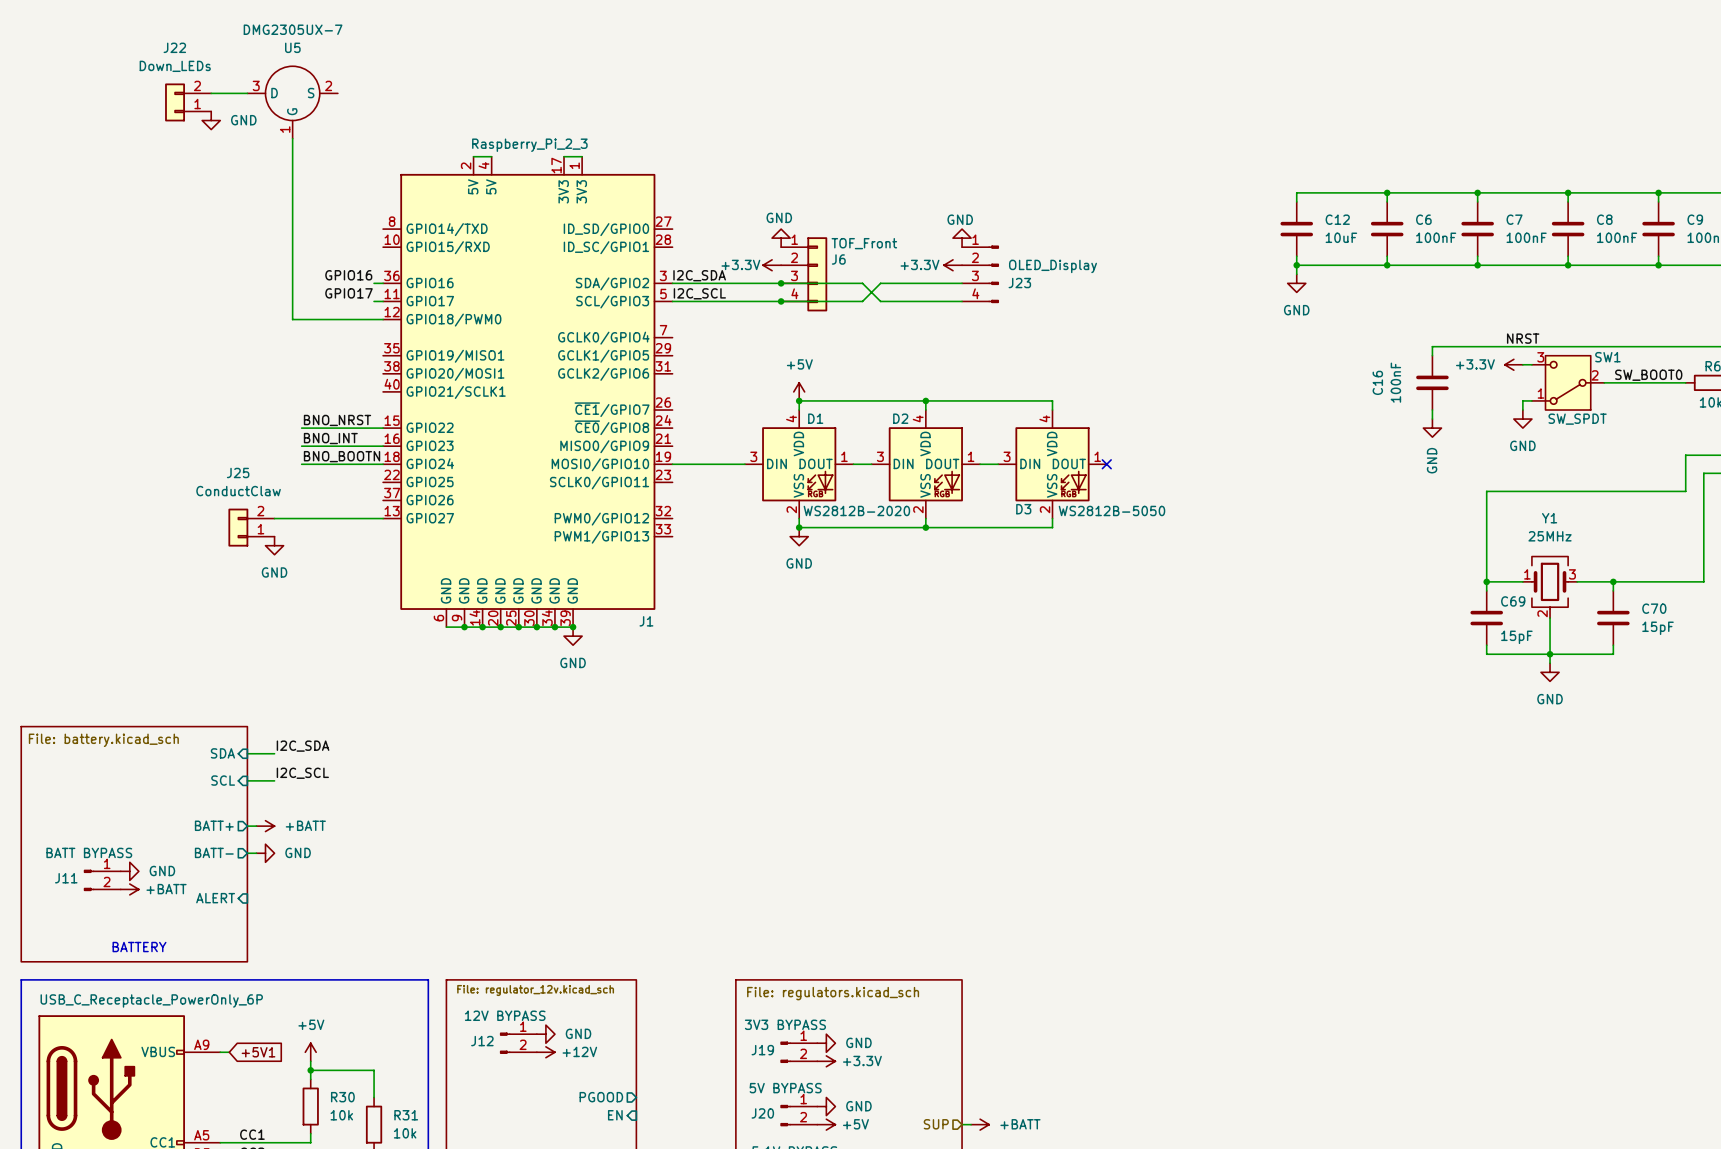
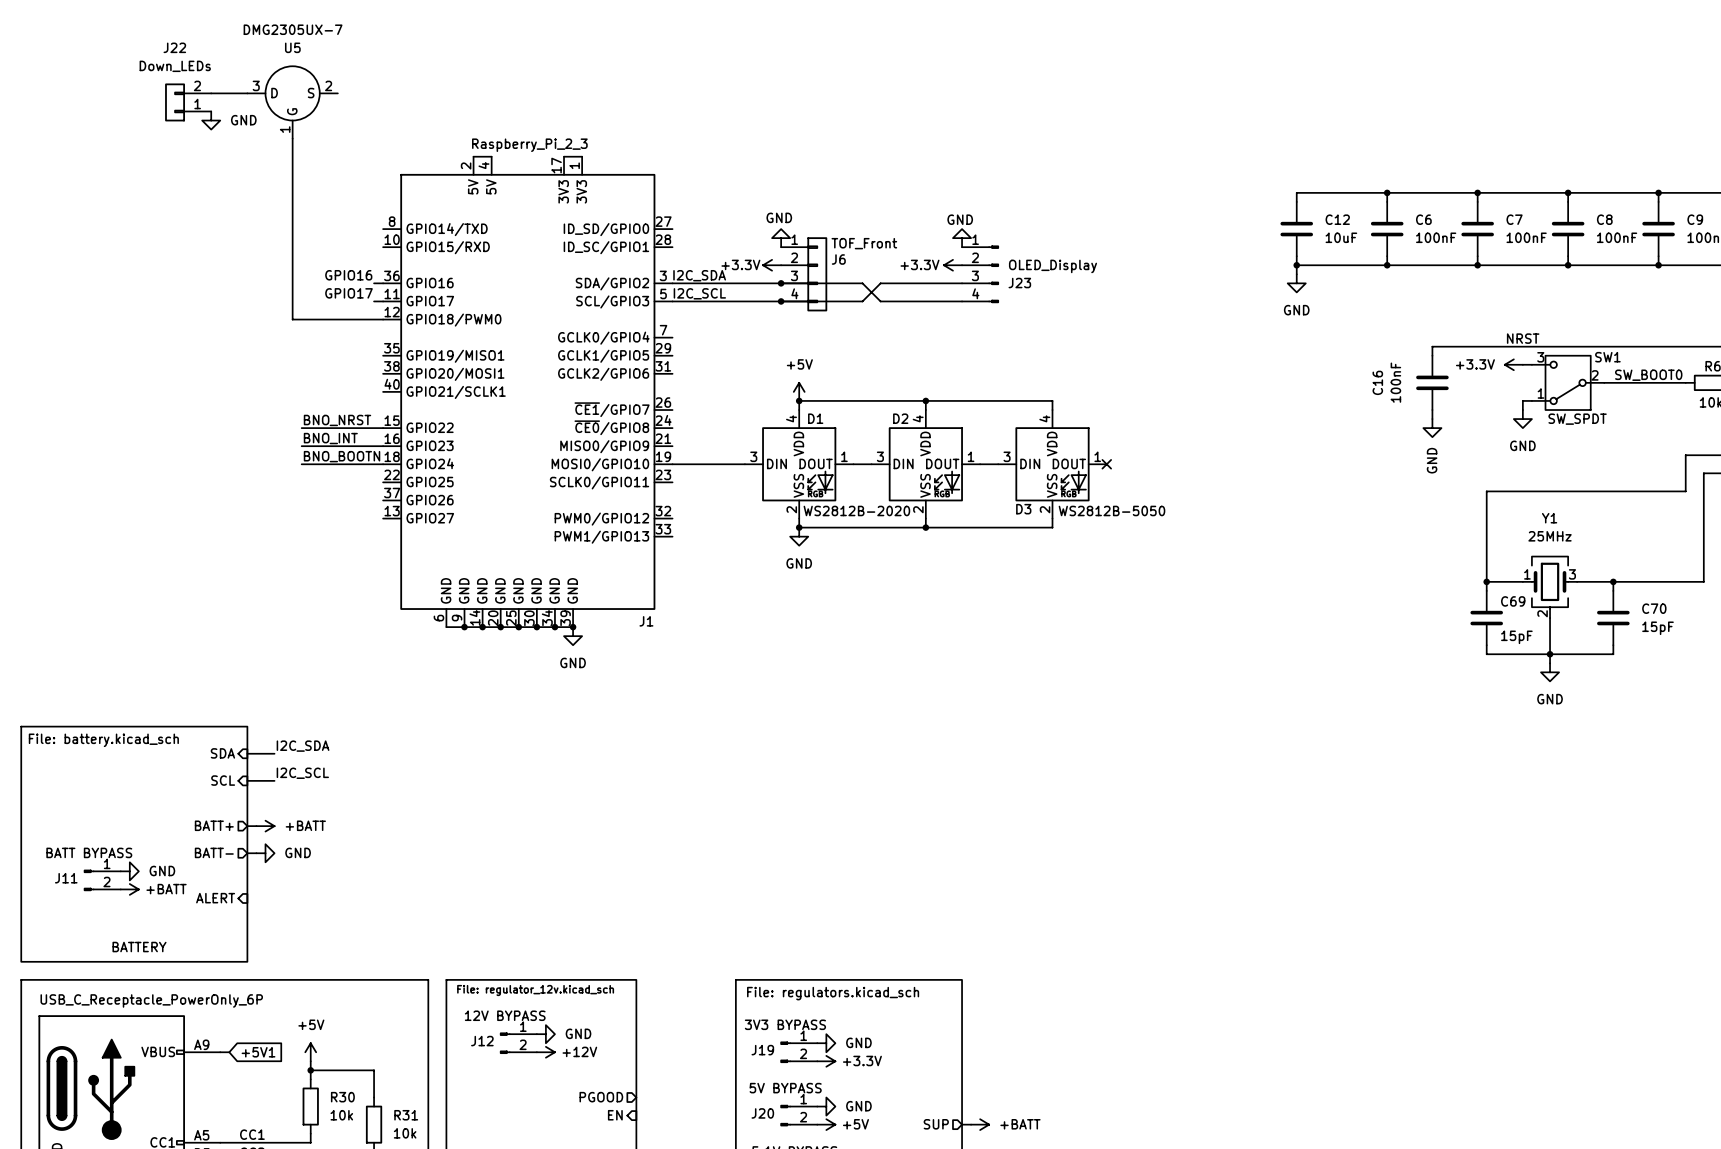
wire: (274, 518) (383, 518) -> none
J25: ConductClaw (251, 527) -> none
power symbol: GND (274, 545) -> none

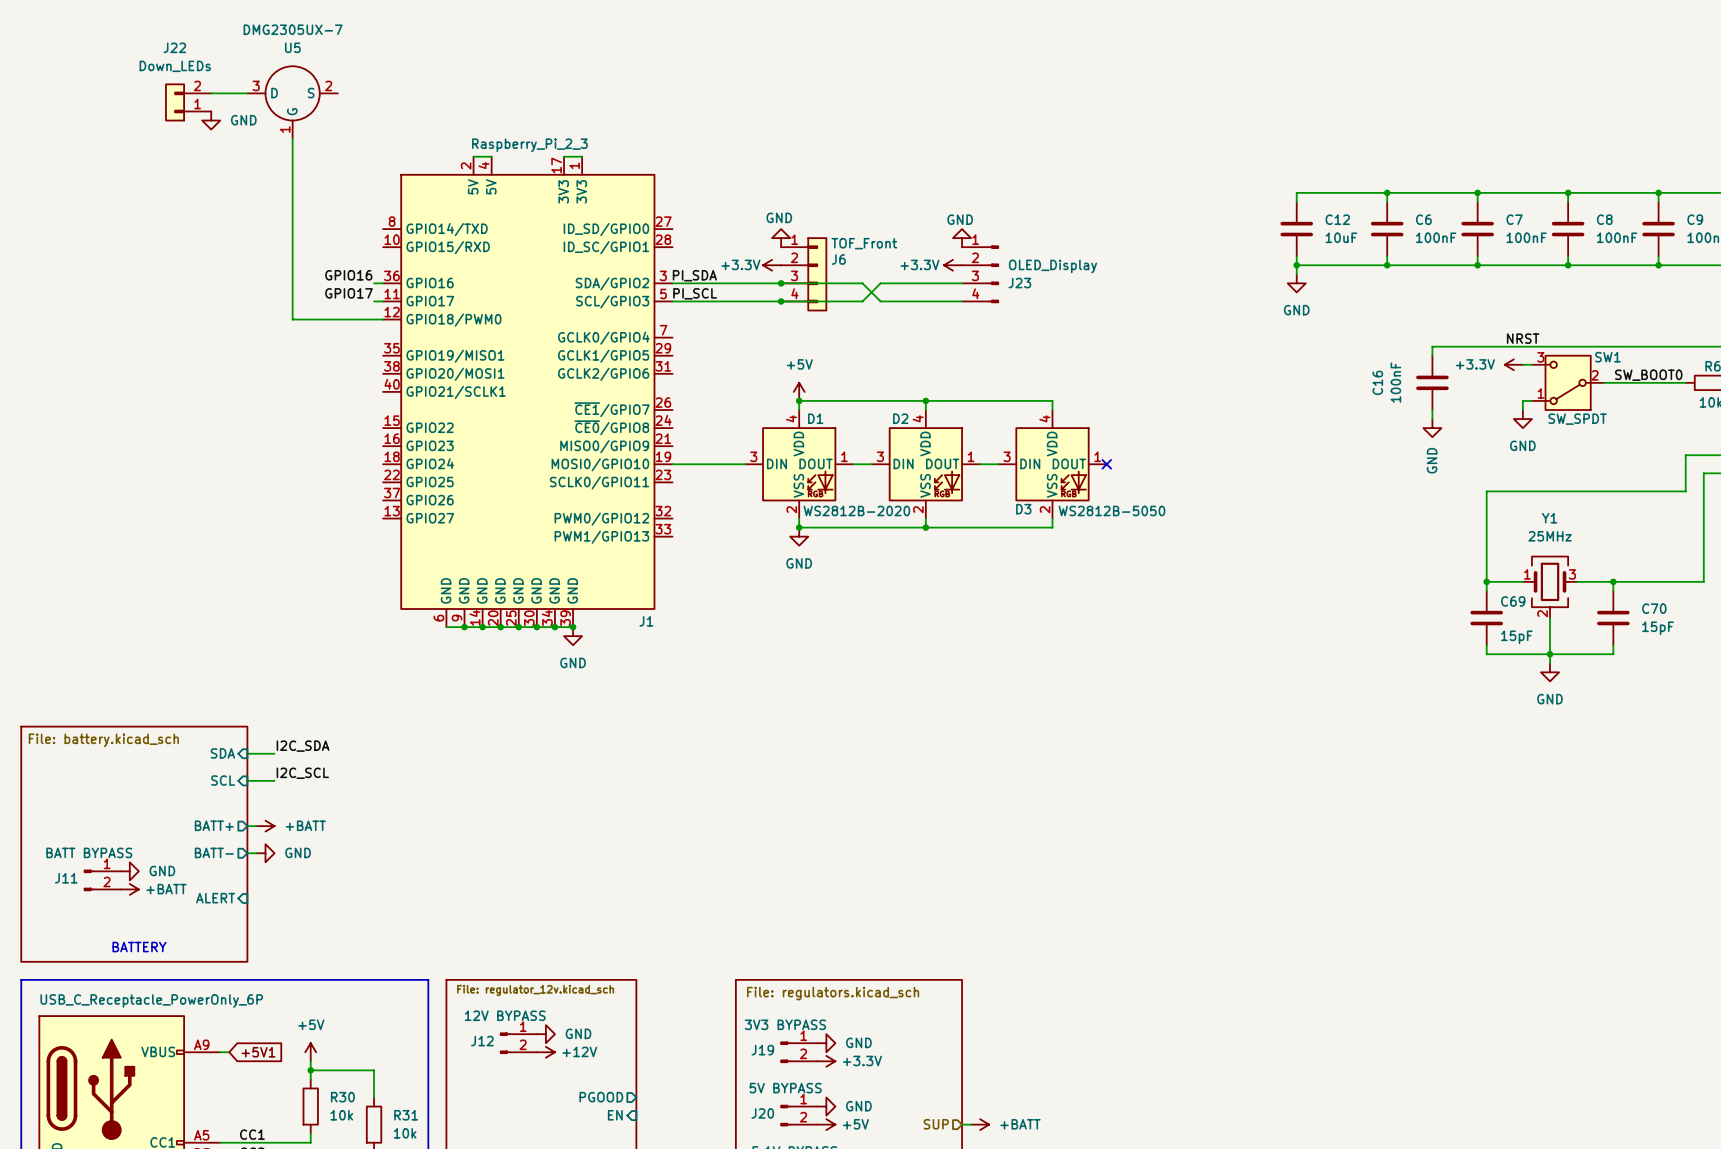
label: I2C_SDA (699, 275) -> PI_SDA (694, 275)
label: I2C_SCL (699, 293) -> PI_SCL (695, 293)
label: BNO_NRST (337, 420) -> none
wire: (301, 428) (383, 428) -> none
label: BNO_INT (330, 438) -> none
wire: (301, 446) (383, 446) -> none
label: BNO_BOOTN (342, 456) -> none
wire: (301, 464) (383, 464) -> none

